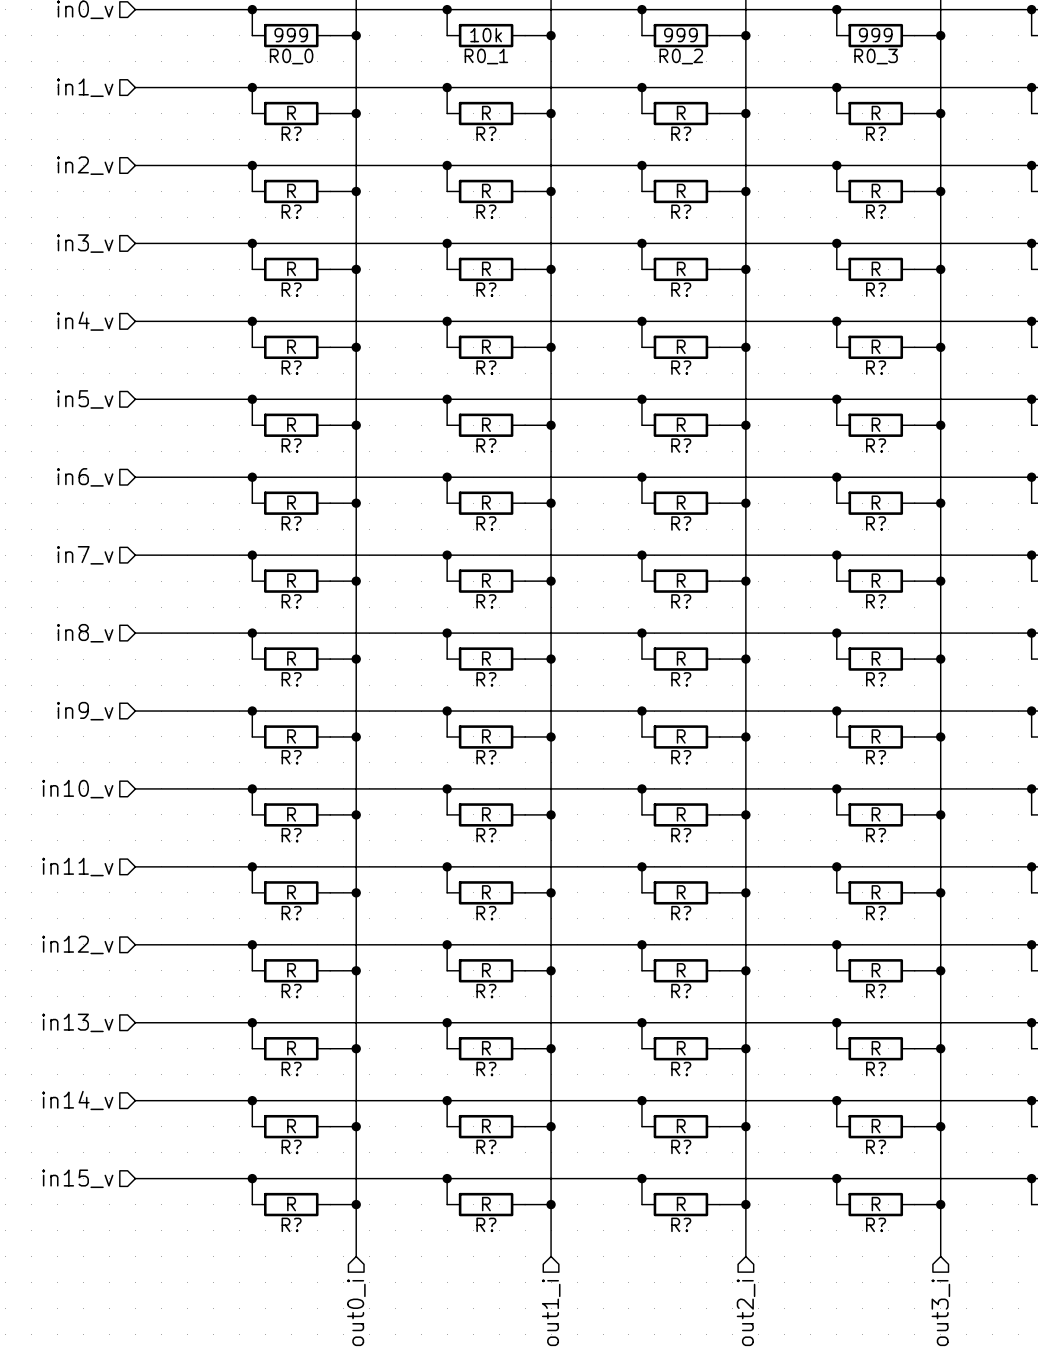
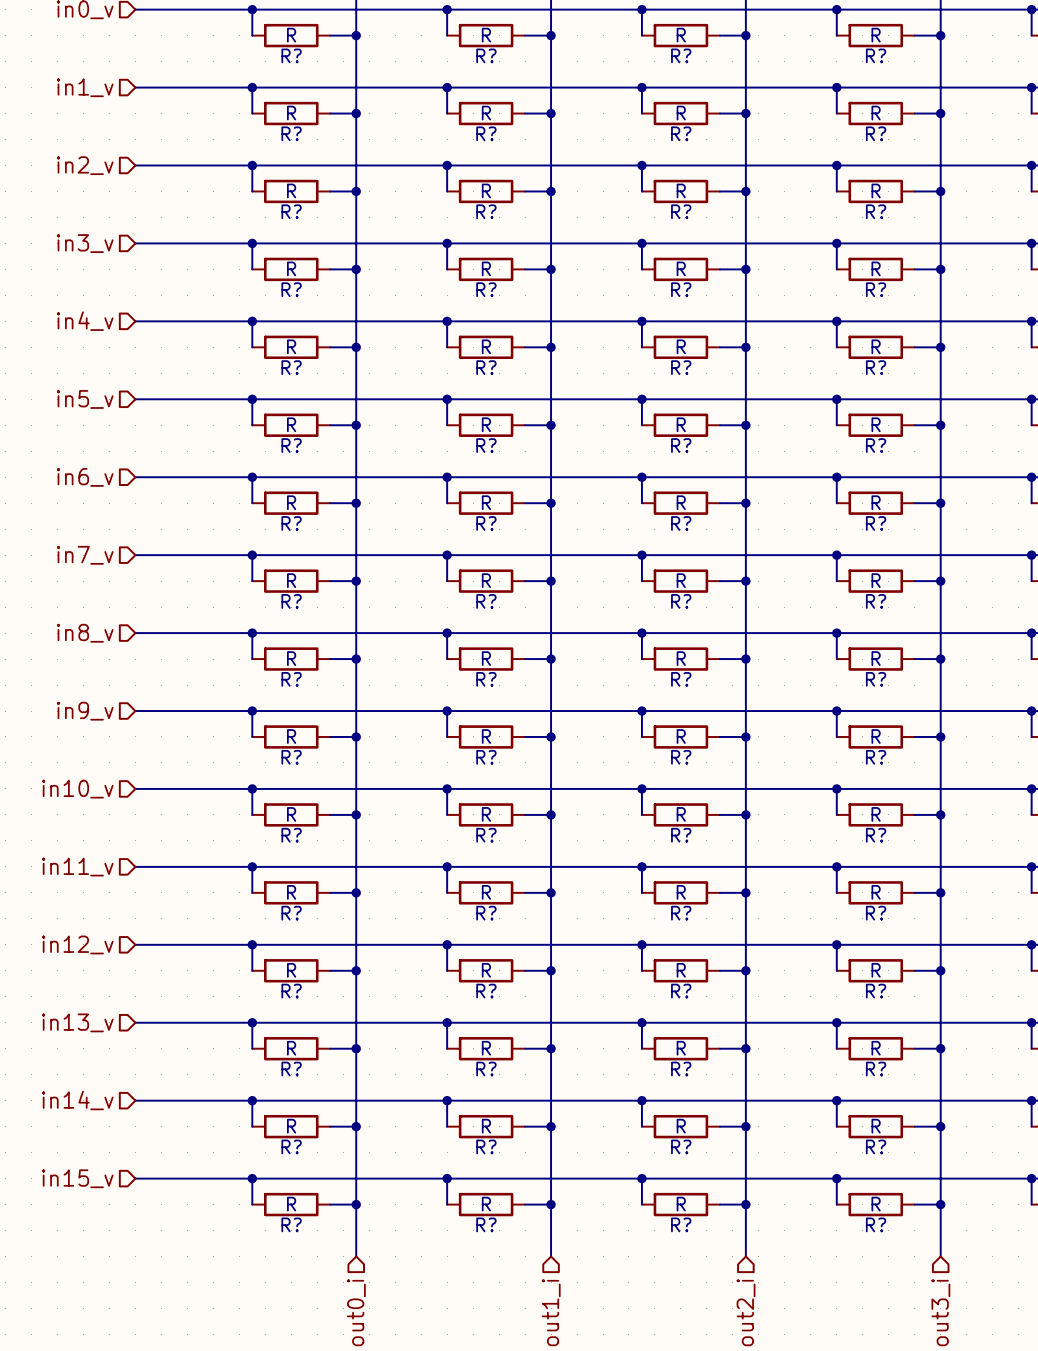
R0_0 value: 999 (291, 35) -> R (291, 35)
R0_1 value: 10k (486, 35) -> R (486, 35)
R0_2 value: 999 (680, 35) -> R (681, 35)
R0_3 value: 999 (875, 35) -> R (876, 35)
R0_0 name: R0_0 (291, 56) -> R? (291, 55)
R0_1 name: R0_1 (486, 56) -> R? (486, 55)
R0_2 name: R0_2 (681, 56) -> R? (681, 55)
R0_3 name: R0_3 (876, 56) -> R? (876, 55)

